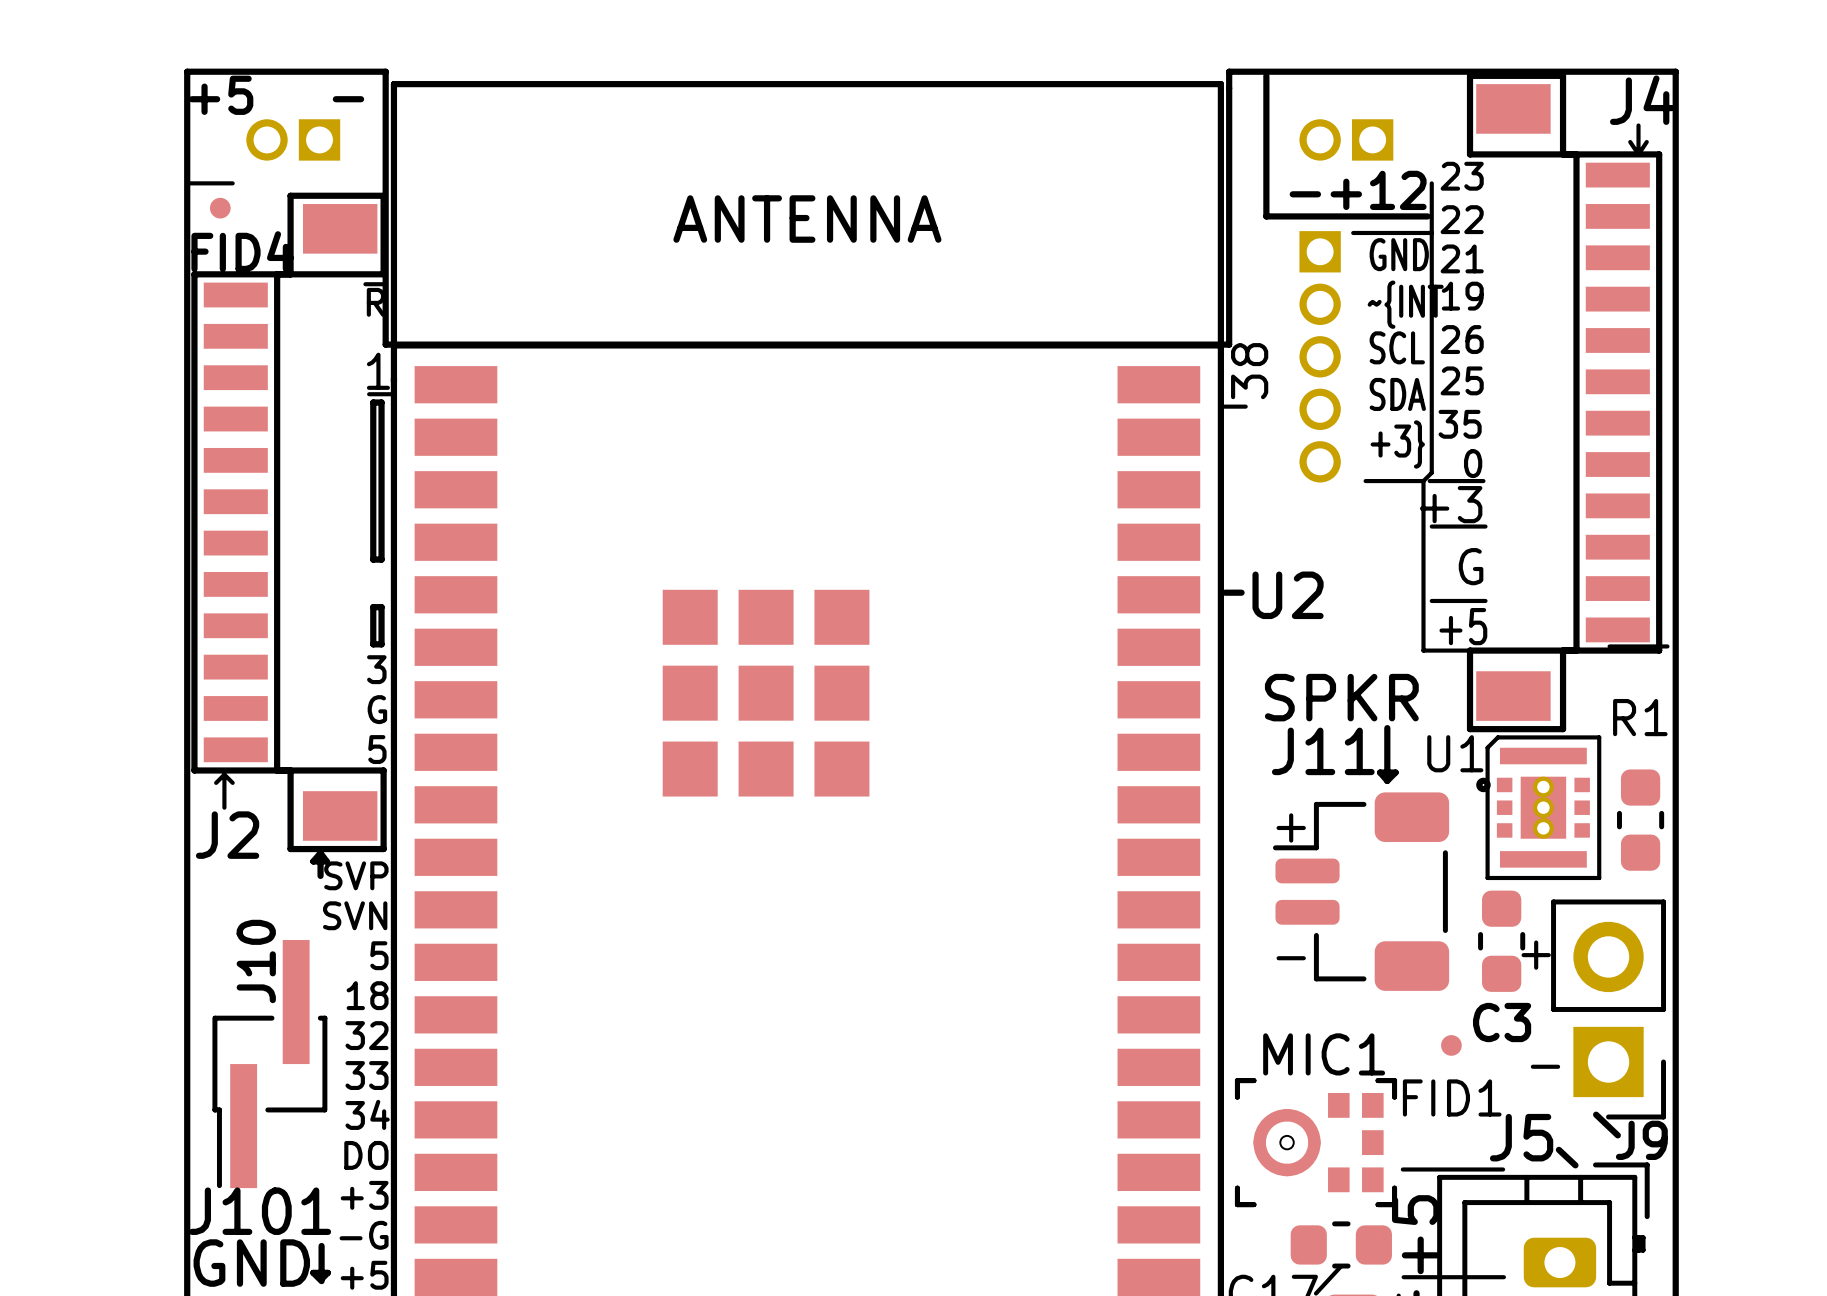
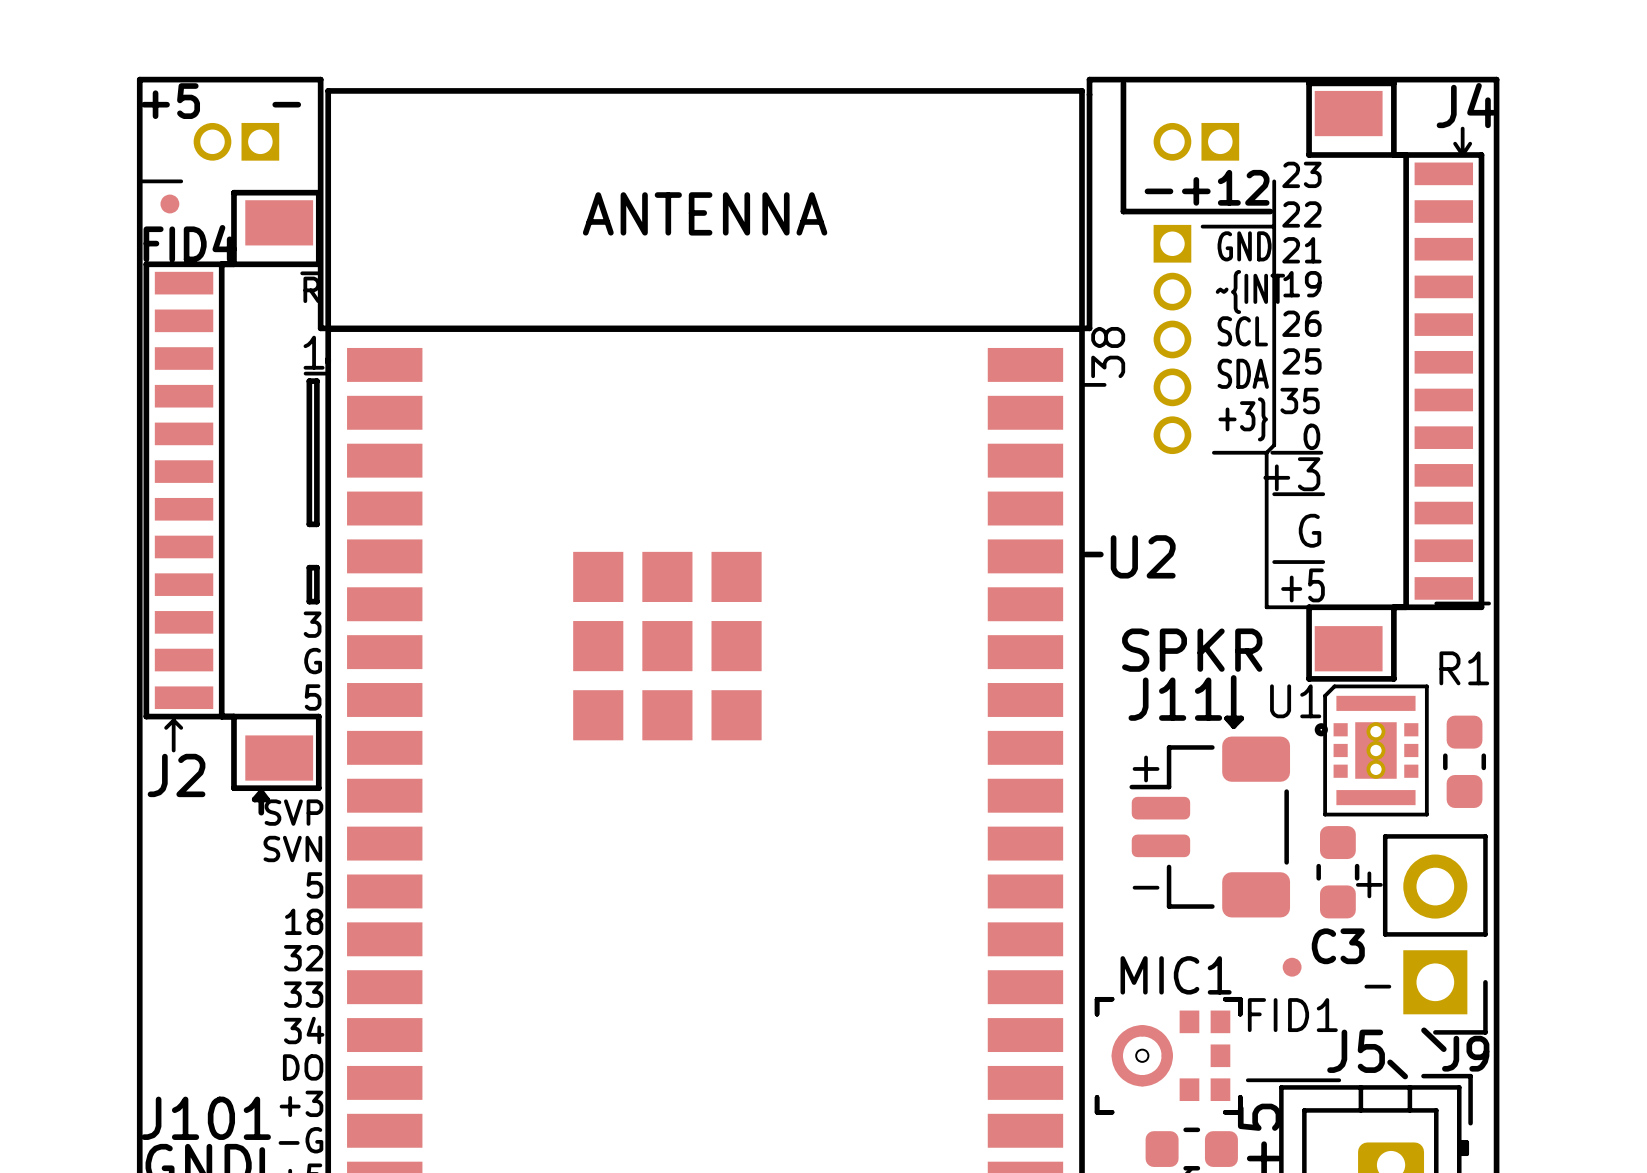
J10: (269, 1064) -> none

